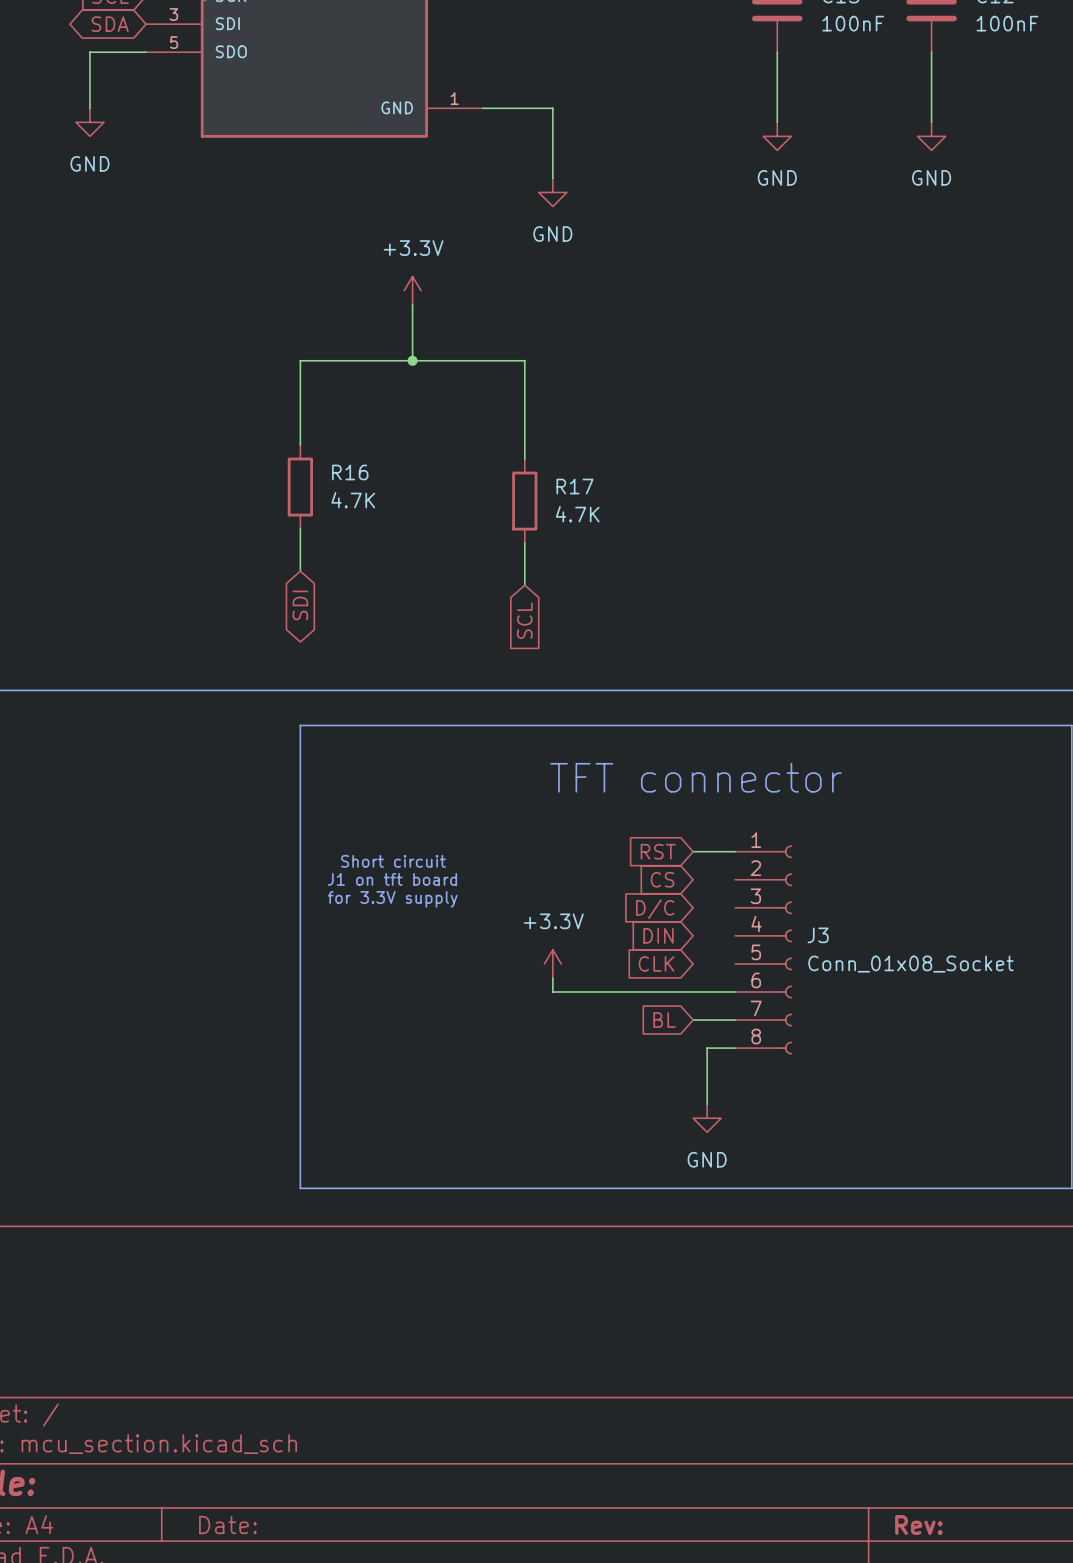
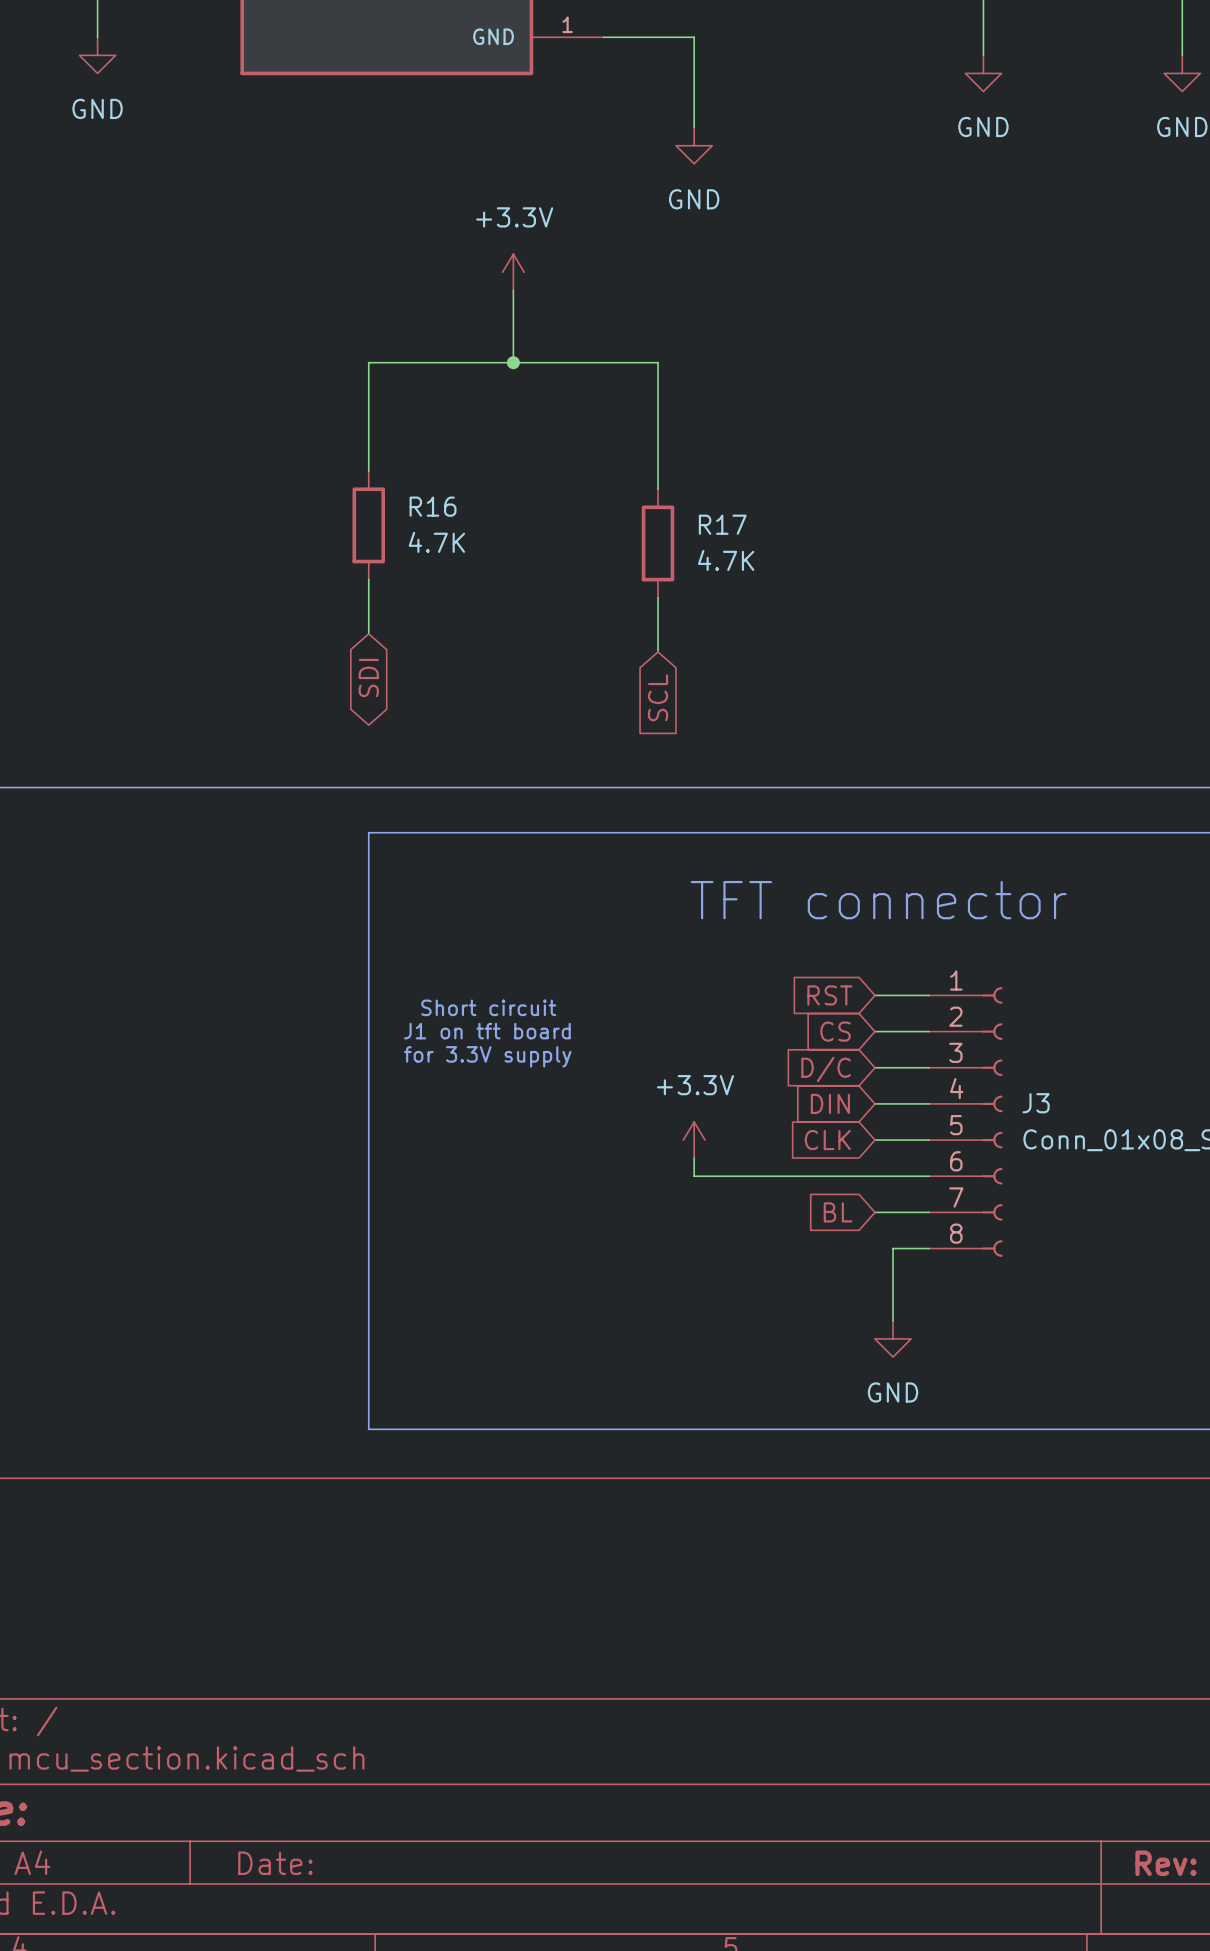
wire: none -> (874, 1031) (929, 1031)
wire: none -> (874, 1067) (929, 1067)
wire: none -> (874, 1103) (929, 1103)
wire: none -> (874, 1140) (929, 1140)

